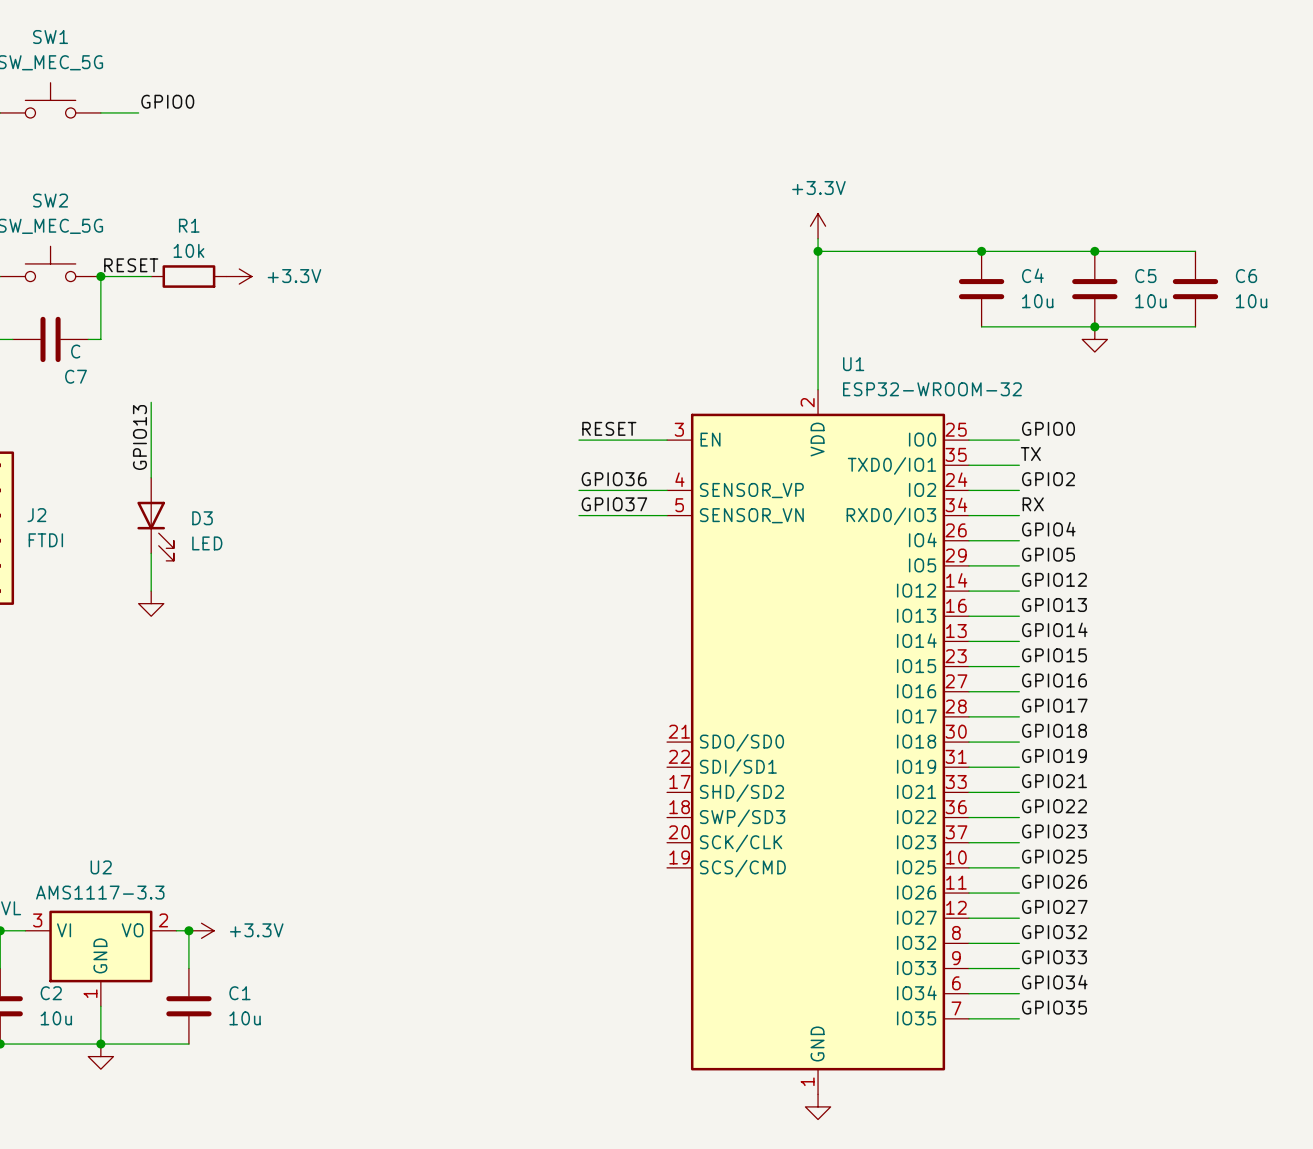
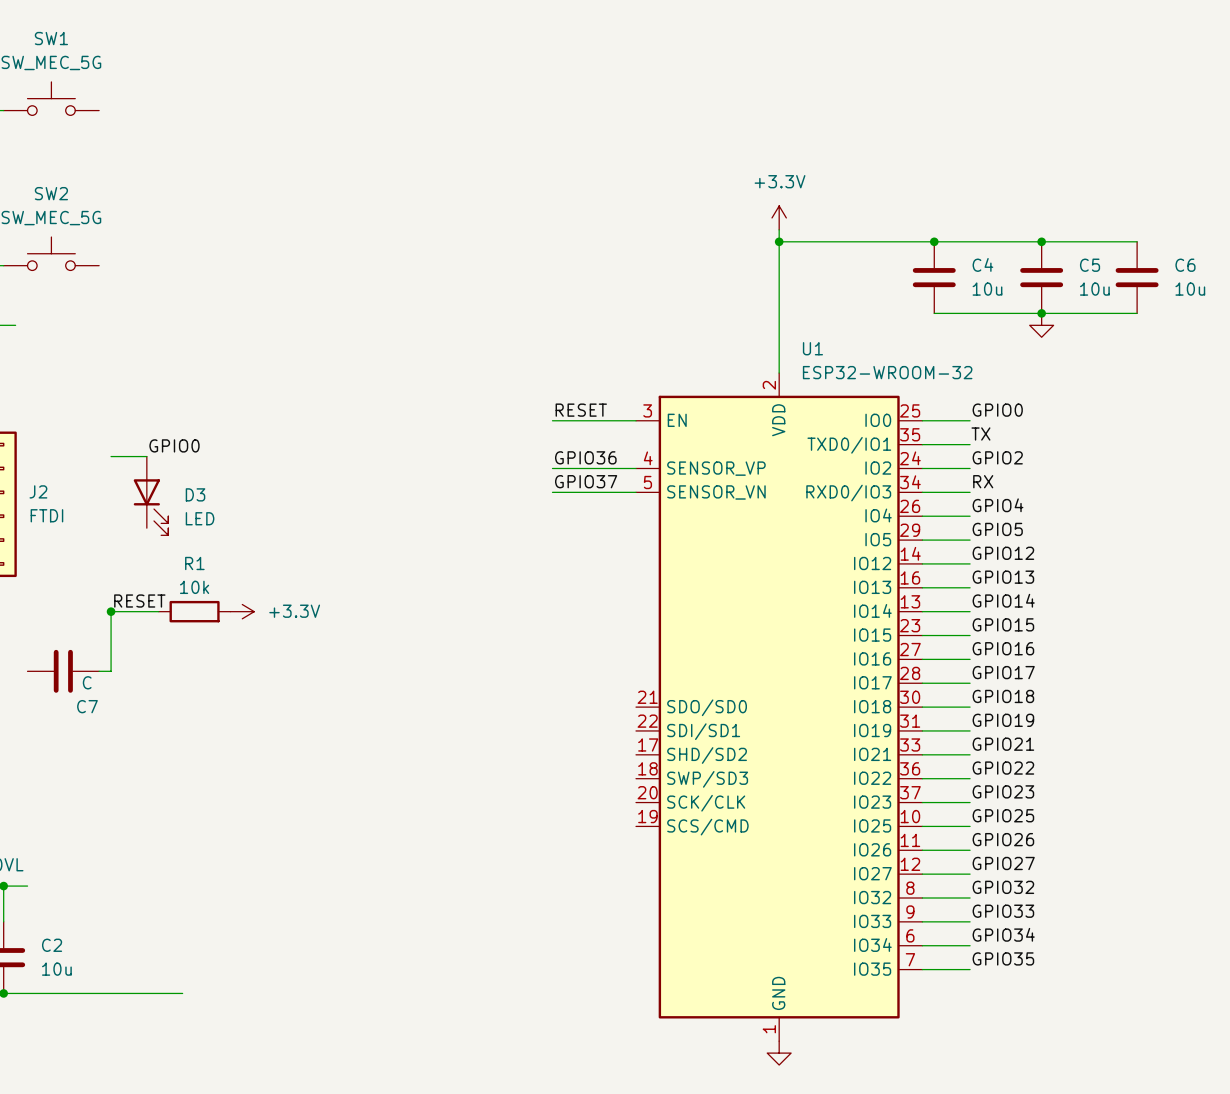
label: GPIO0 (167, 101) -> none
wire: (100, 112) (138, 112) -> none
label: RESET (131, 265) -> none
junction: (100, 276) -> none
wire: (151, 276) (100, 276) (100, 339) (88, 339) -> none
R1 position: (188, 276) -> (194, 611)
power symbol: +3.3V (239, 276) -> none
C7 position: (50, 339) -> (63, 671)
wire: (151, 402) (151, 477) -> (111, 456) (146, 456)
label: GPIO13 (139, 437) -> GPIO0 (174, 445)
wire: (151, 553) (151, 591) -> none
power symbol: (151, 603) -> none
label: none -> RESET (139, 601)
junction: none -> (111, 611)
wire: none -> (158, 611) (111, 611) (111, 671) (99, 671)
power symbol: none -> +3.3V (242, 611)
wire: (176, 930) (188, 930) (188, 968) -> none
junction: (188, 930) -> none
power symbol: +3.3V (201, 930) -> none
U2: AMS1117-3.3 (100, 958) -> none
wire: (100, 1006) (100, 1044) -> none
C1: 10u (188, 1006) -> none
junction: (100, 1044) -> none
power symbol: (100, 1056) -> none

